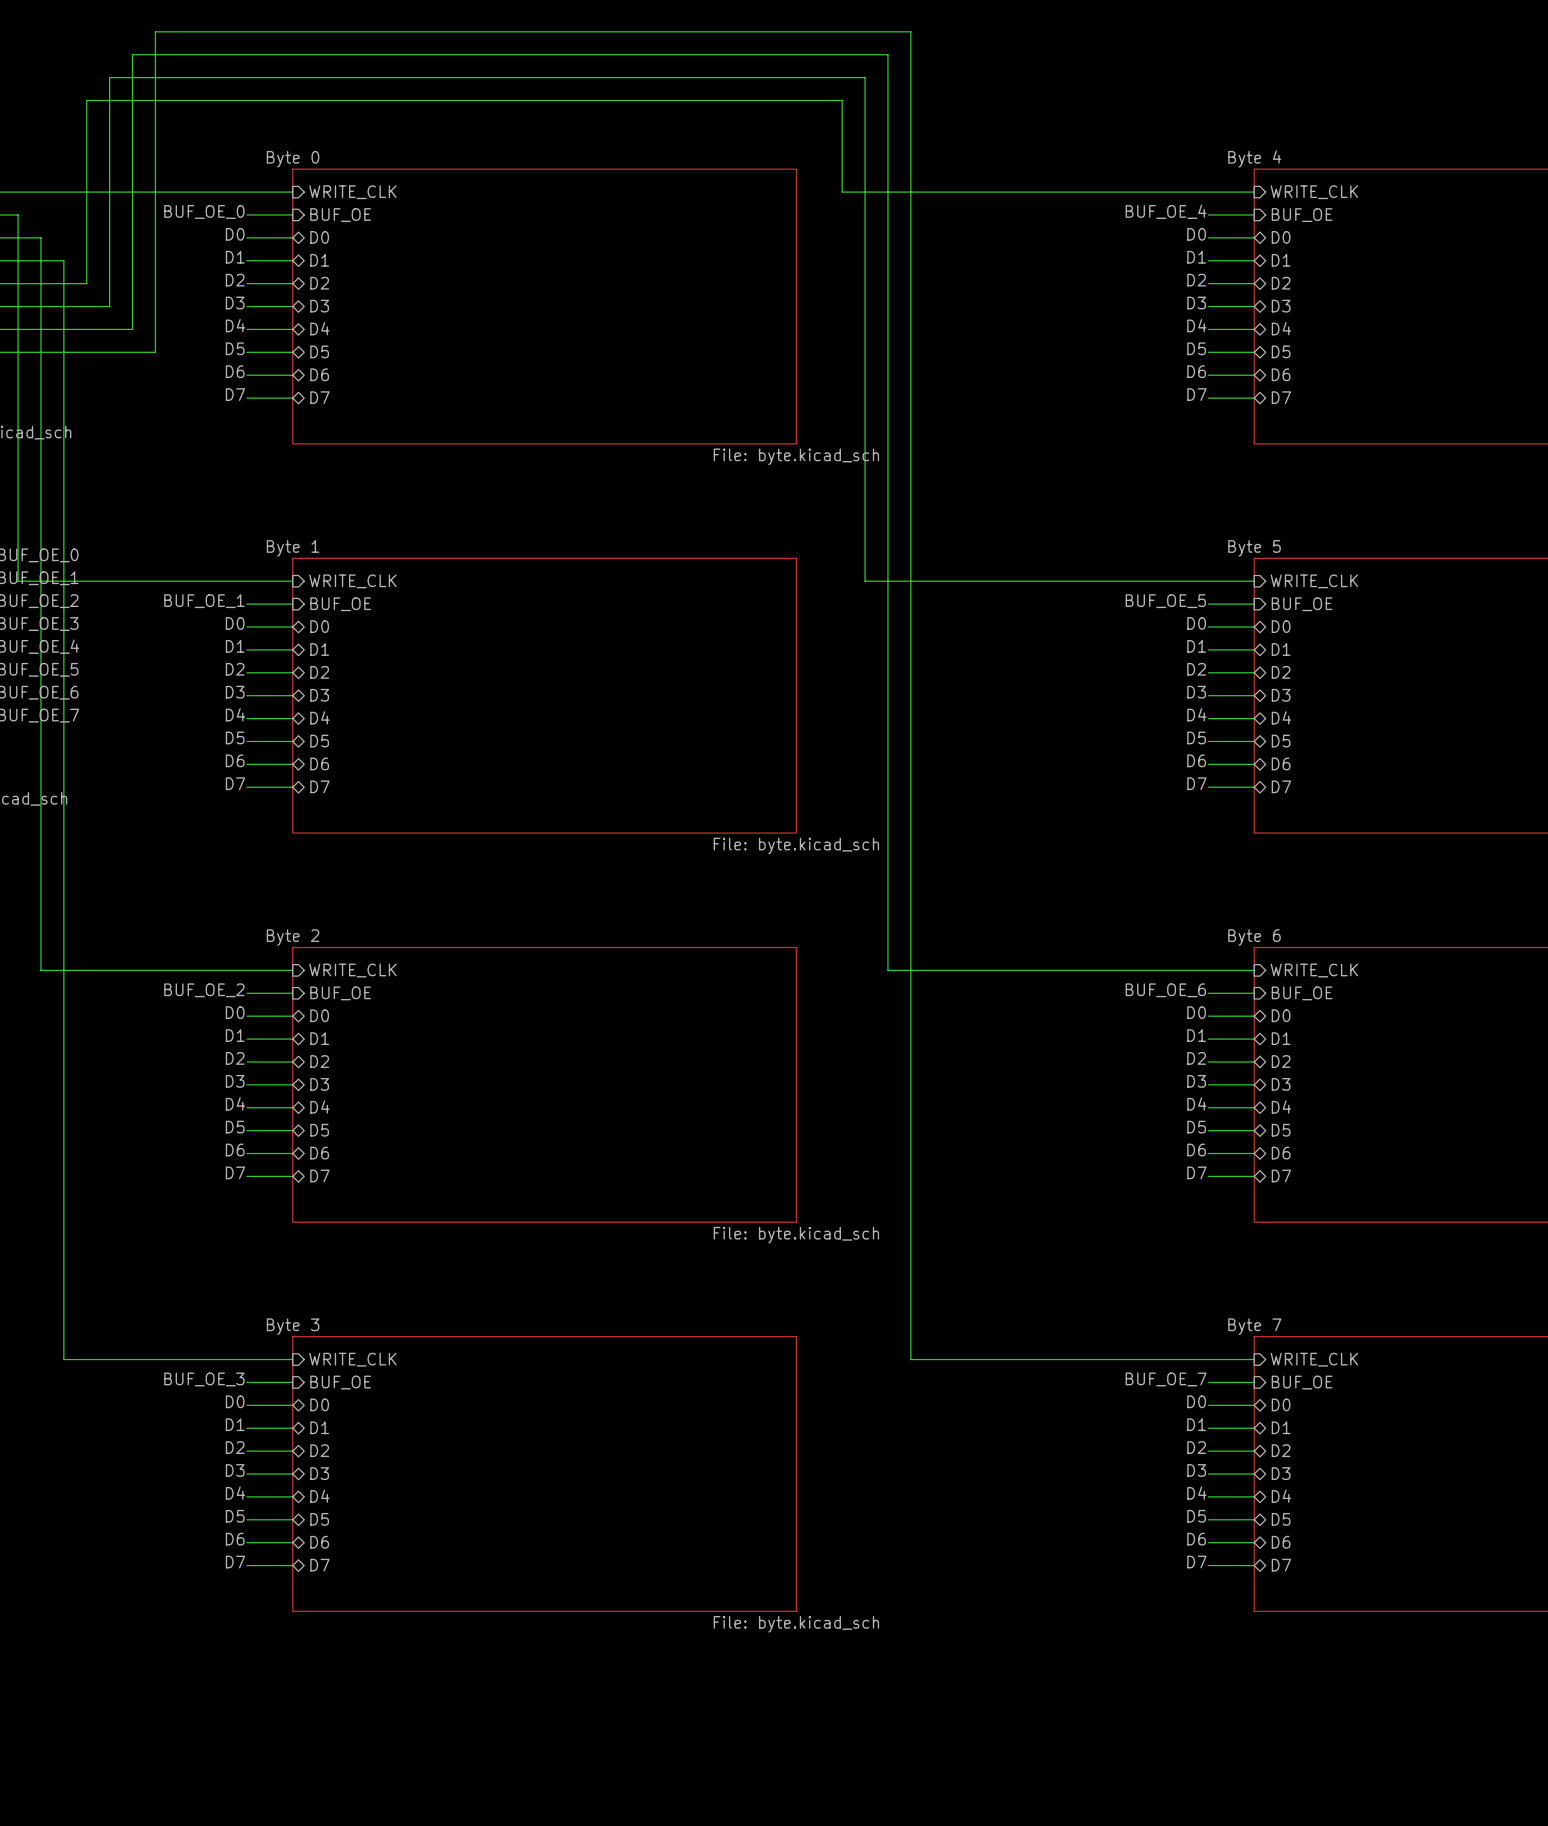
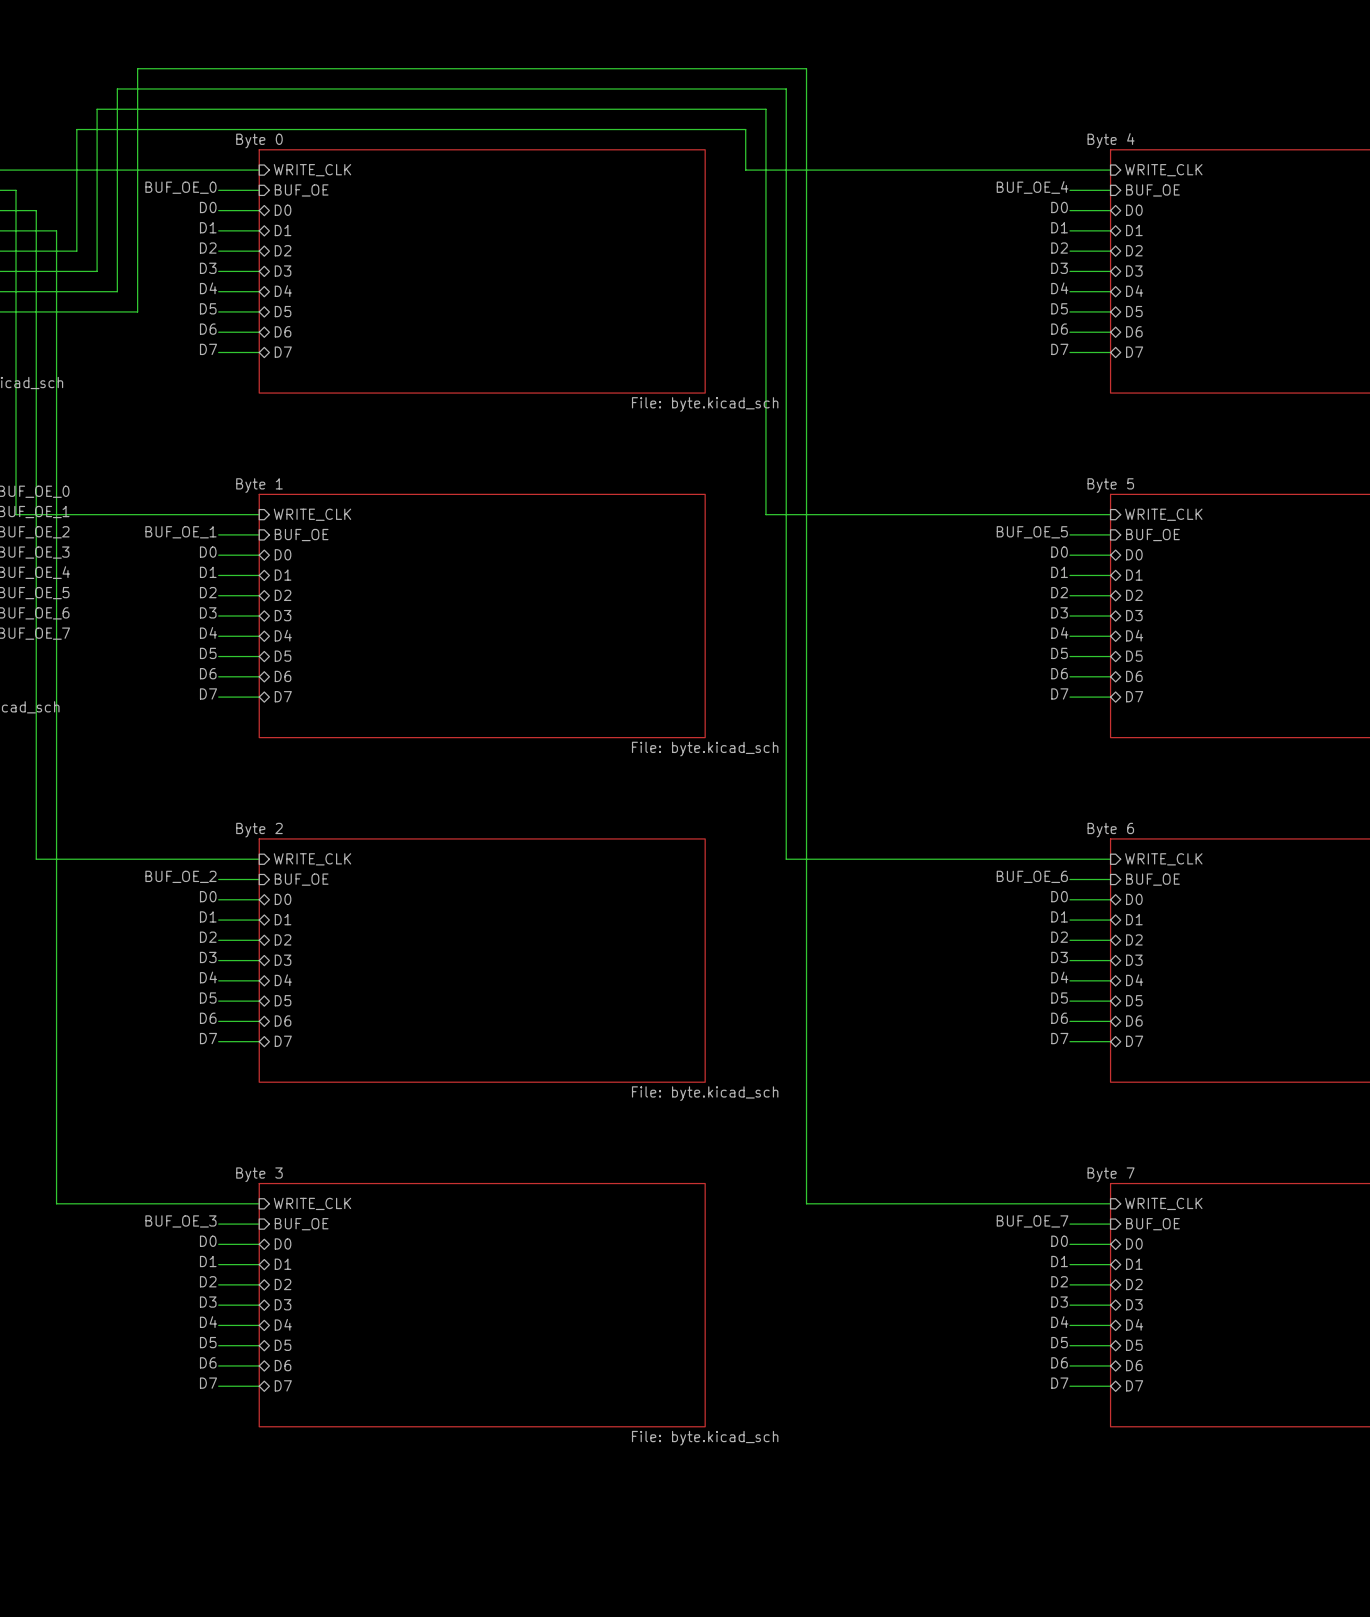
wire: (865, 77) (865, 123) -> (765, 68) (806, 68)
wire: (910, 77) (910, 31) (155, 31) (155, 77) (109, 77) (109, 123) -> (765, 109) (97, 109)
wire: (842, 100) (842, 146) -> (745, 88) (786, 88)
wire: (887, 100) (887, 54) (132, 54) (132, 100) (86, 100) (86, 146) -> (745, 129) (76, 129)

